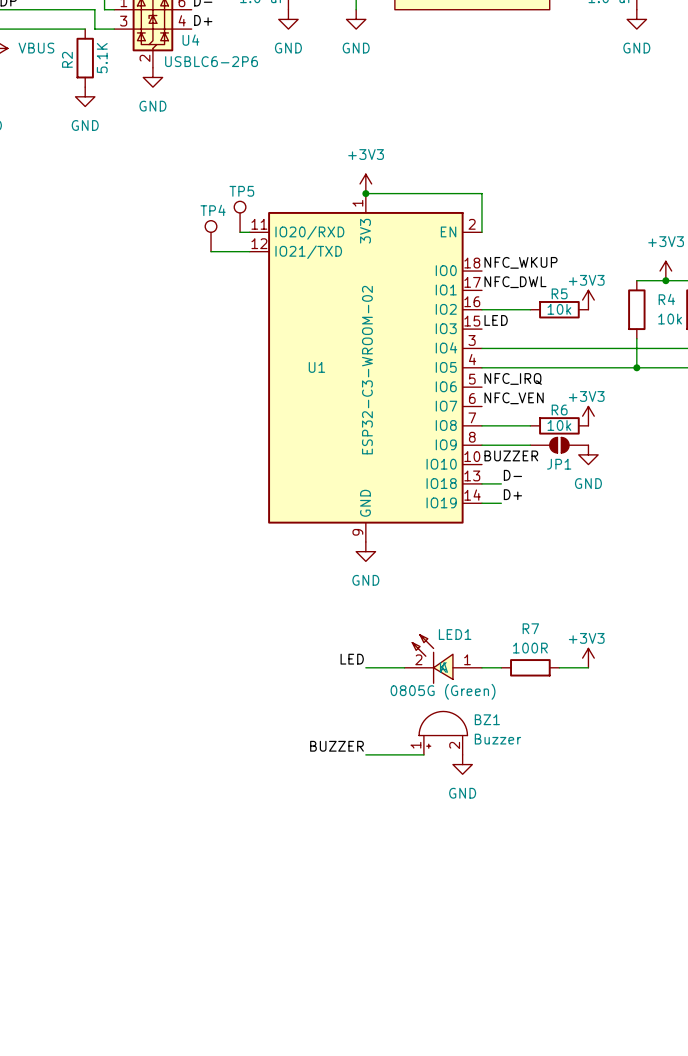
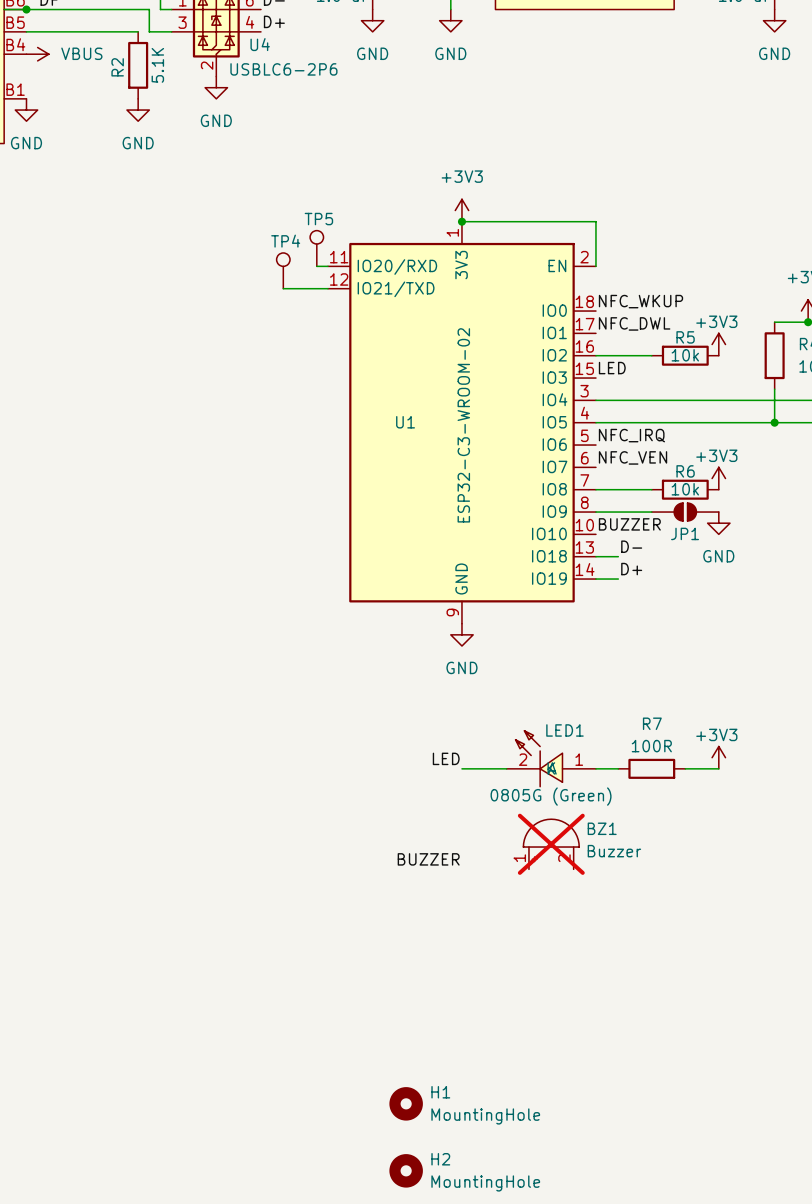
BZ1 do-not-place cross: none -> (551, 844)
wire: (365, 754) (423, 754) -> none
power symbol: GND (462, 764) -> none
H1: none -> MountingHole (406, 1103)
H2: none -> MountingHole (406, 1170)

